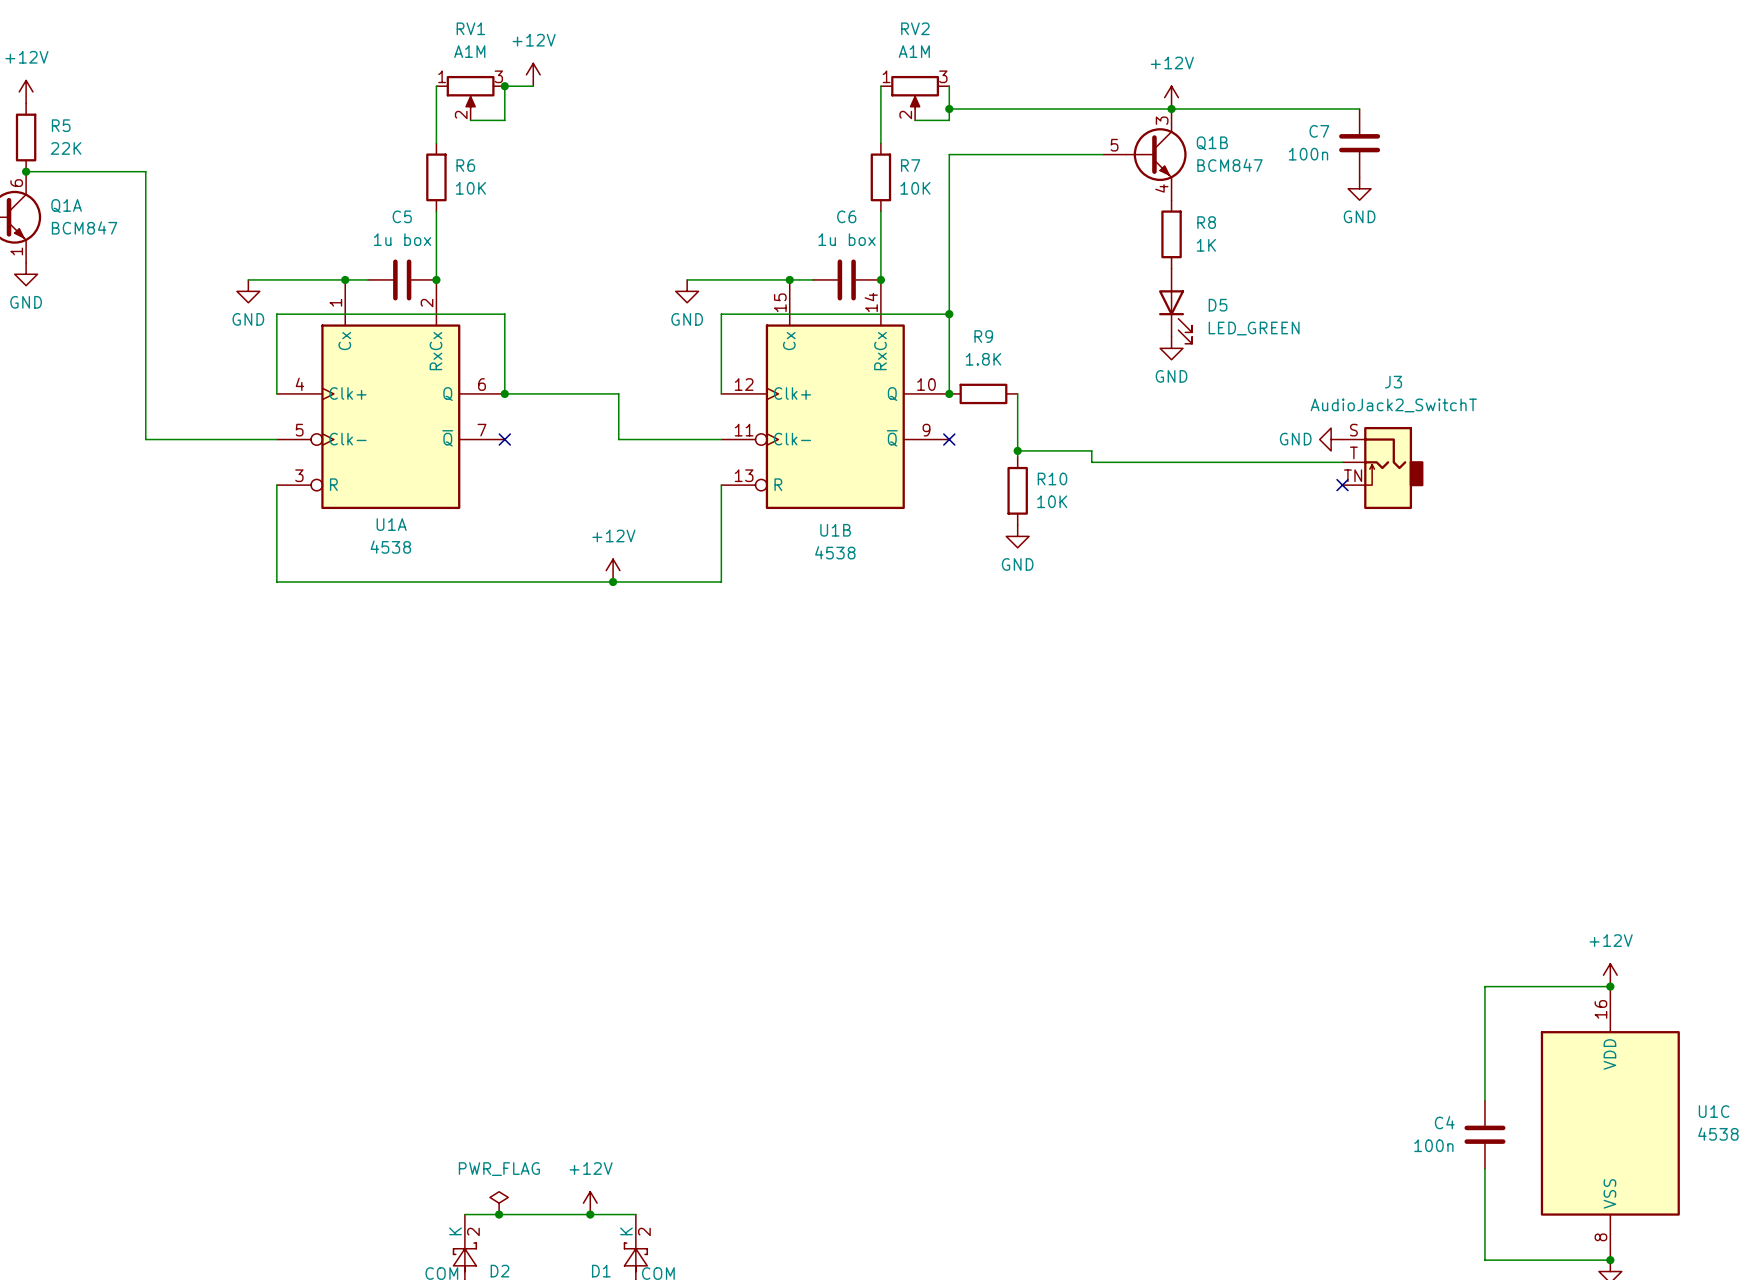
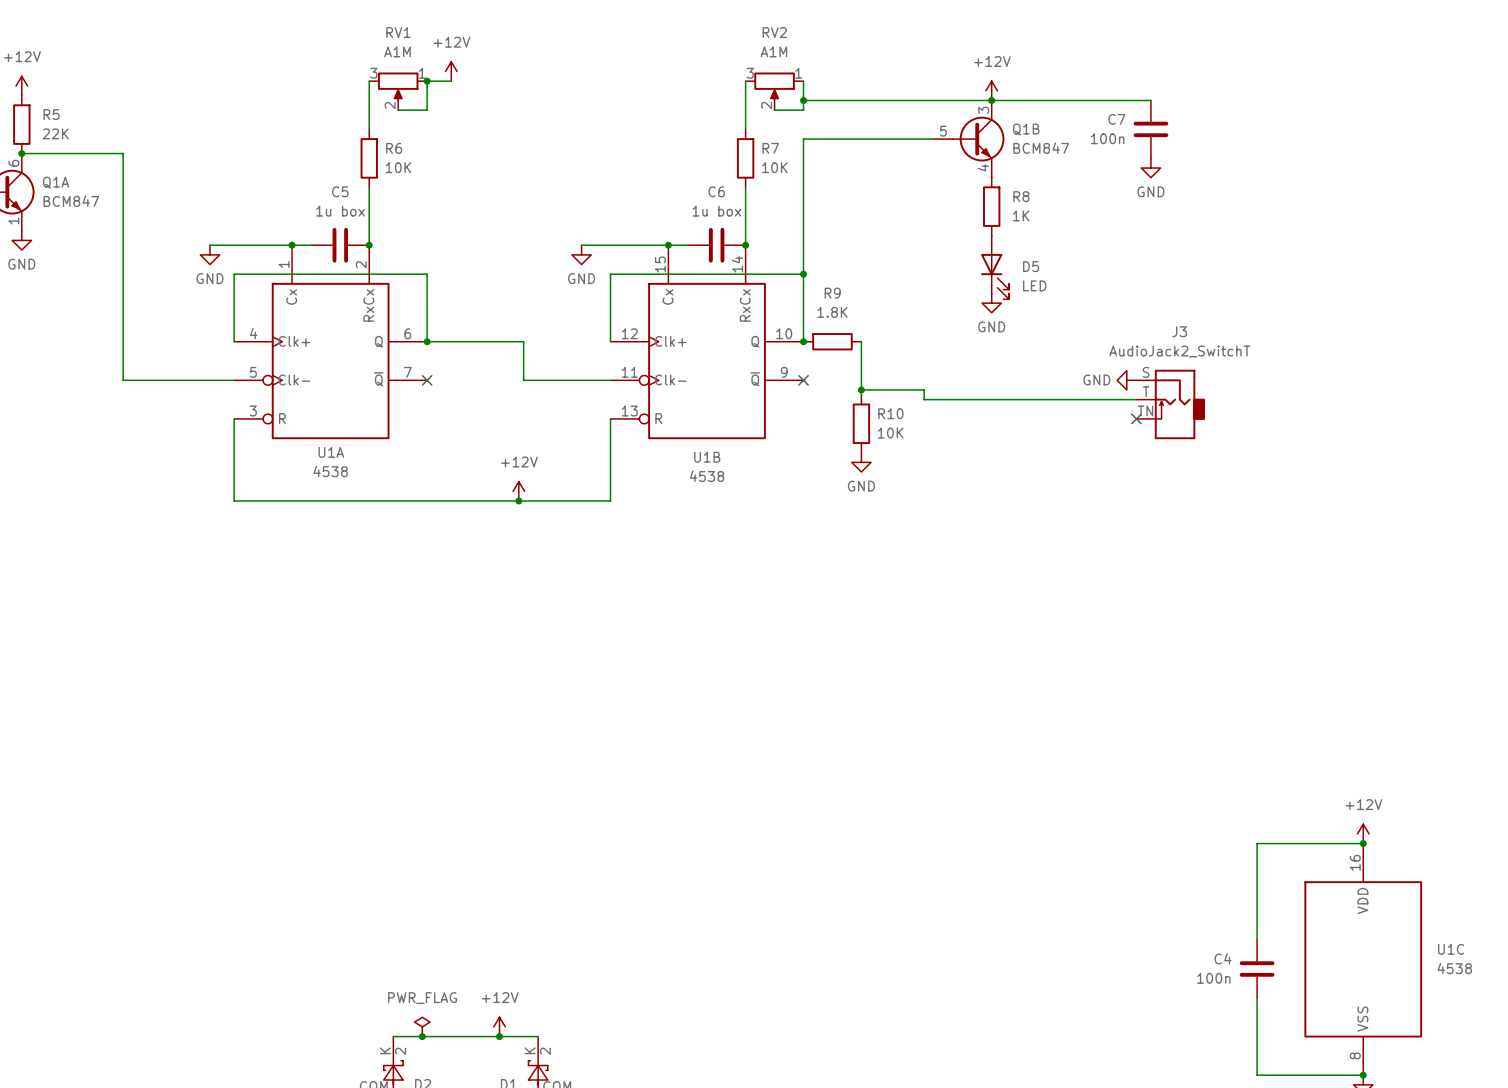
RV1 flip: as is (470, 92) -> left-right (398, 86)
RV2 flip: as is (915, 92) -> left-right (774, 86)
D5 value: LED_GREEN (1254, 328) -> LED (1034, 285)

